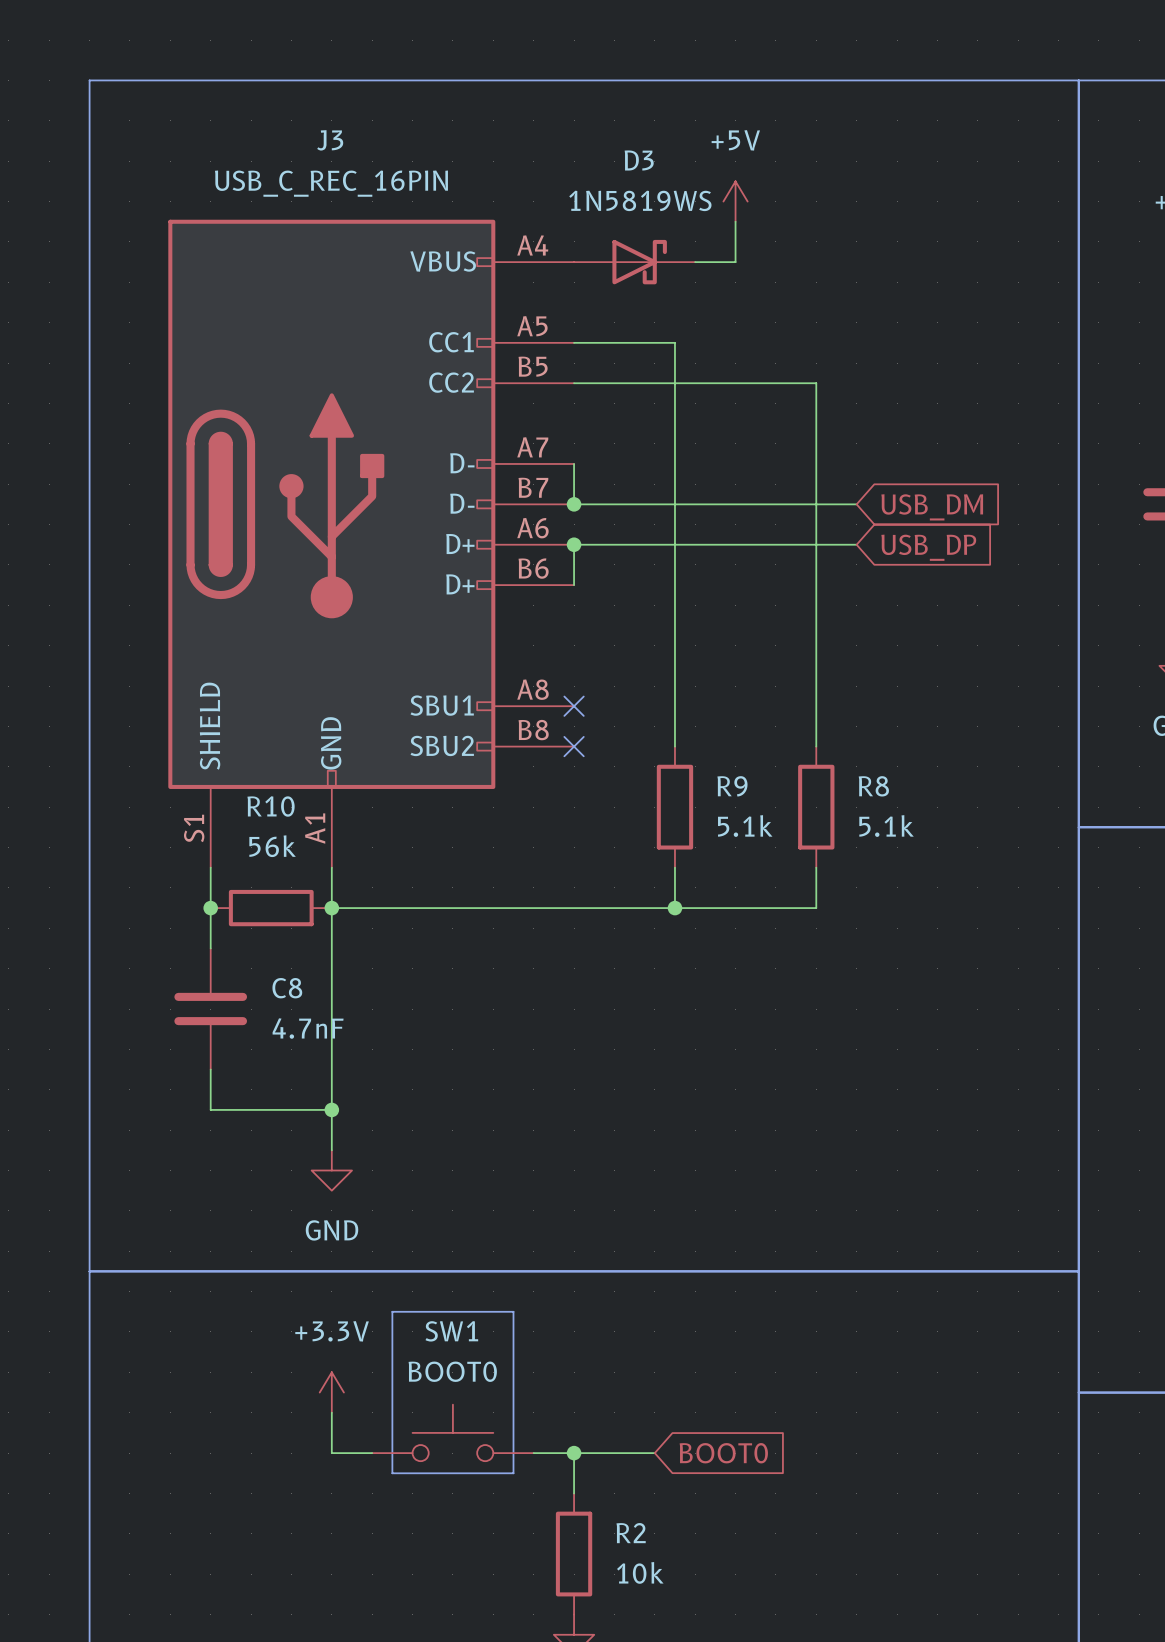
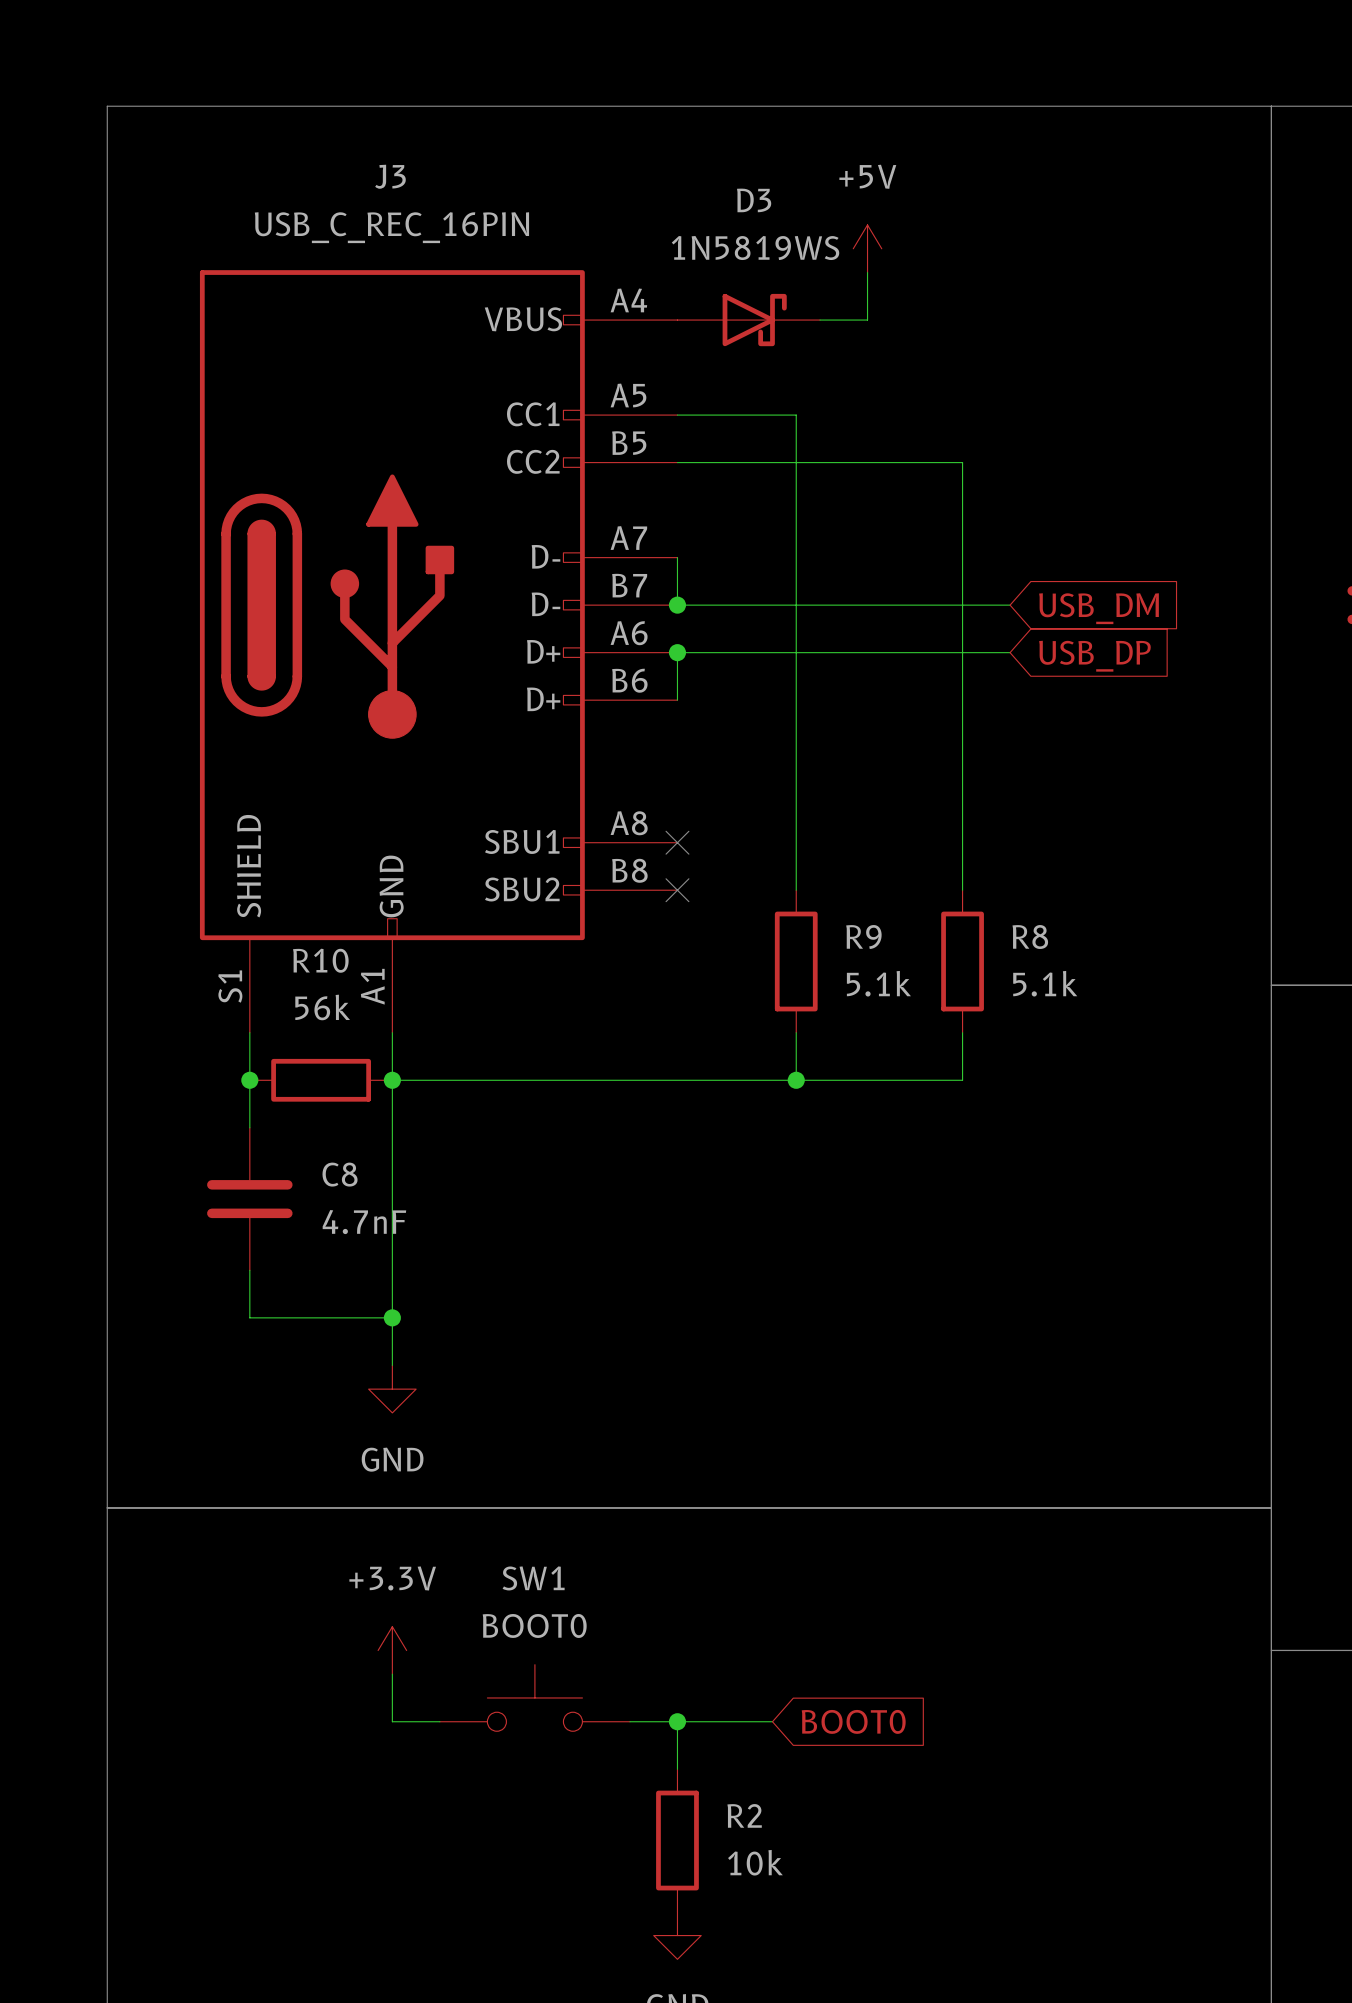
line: (392, 1311) (513, 1311) (513, 1473) (392, 1473) (392, 1311) -> none

